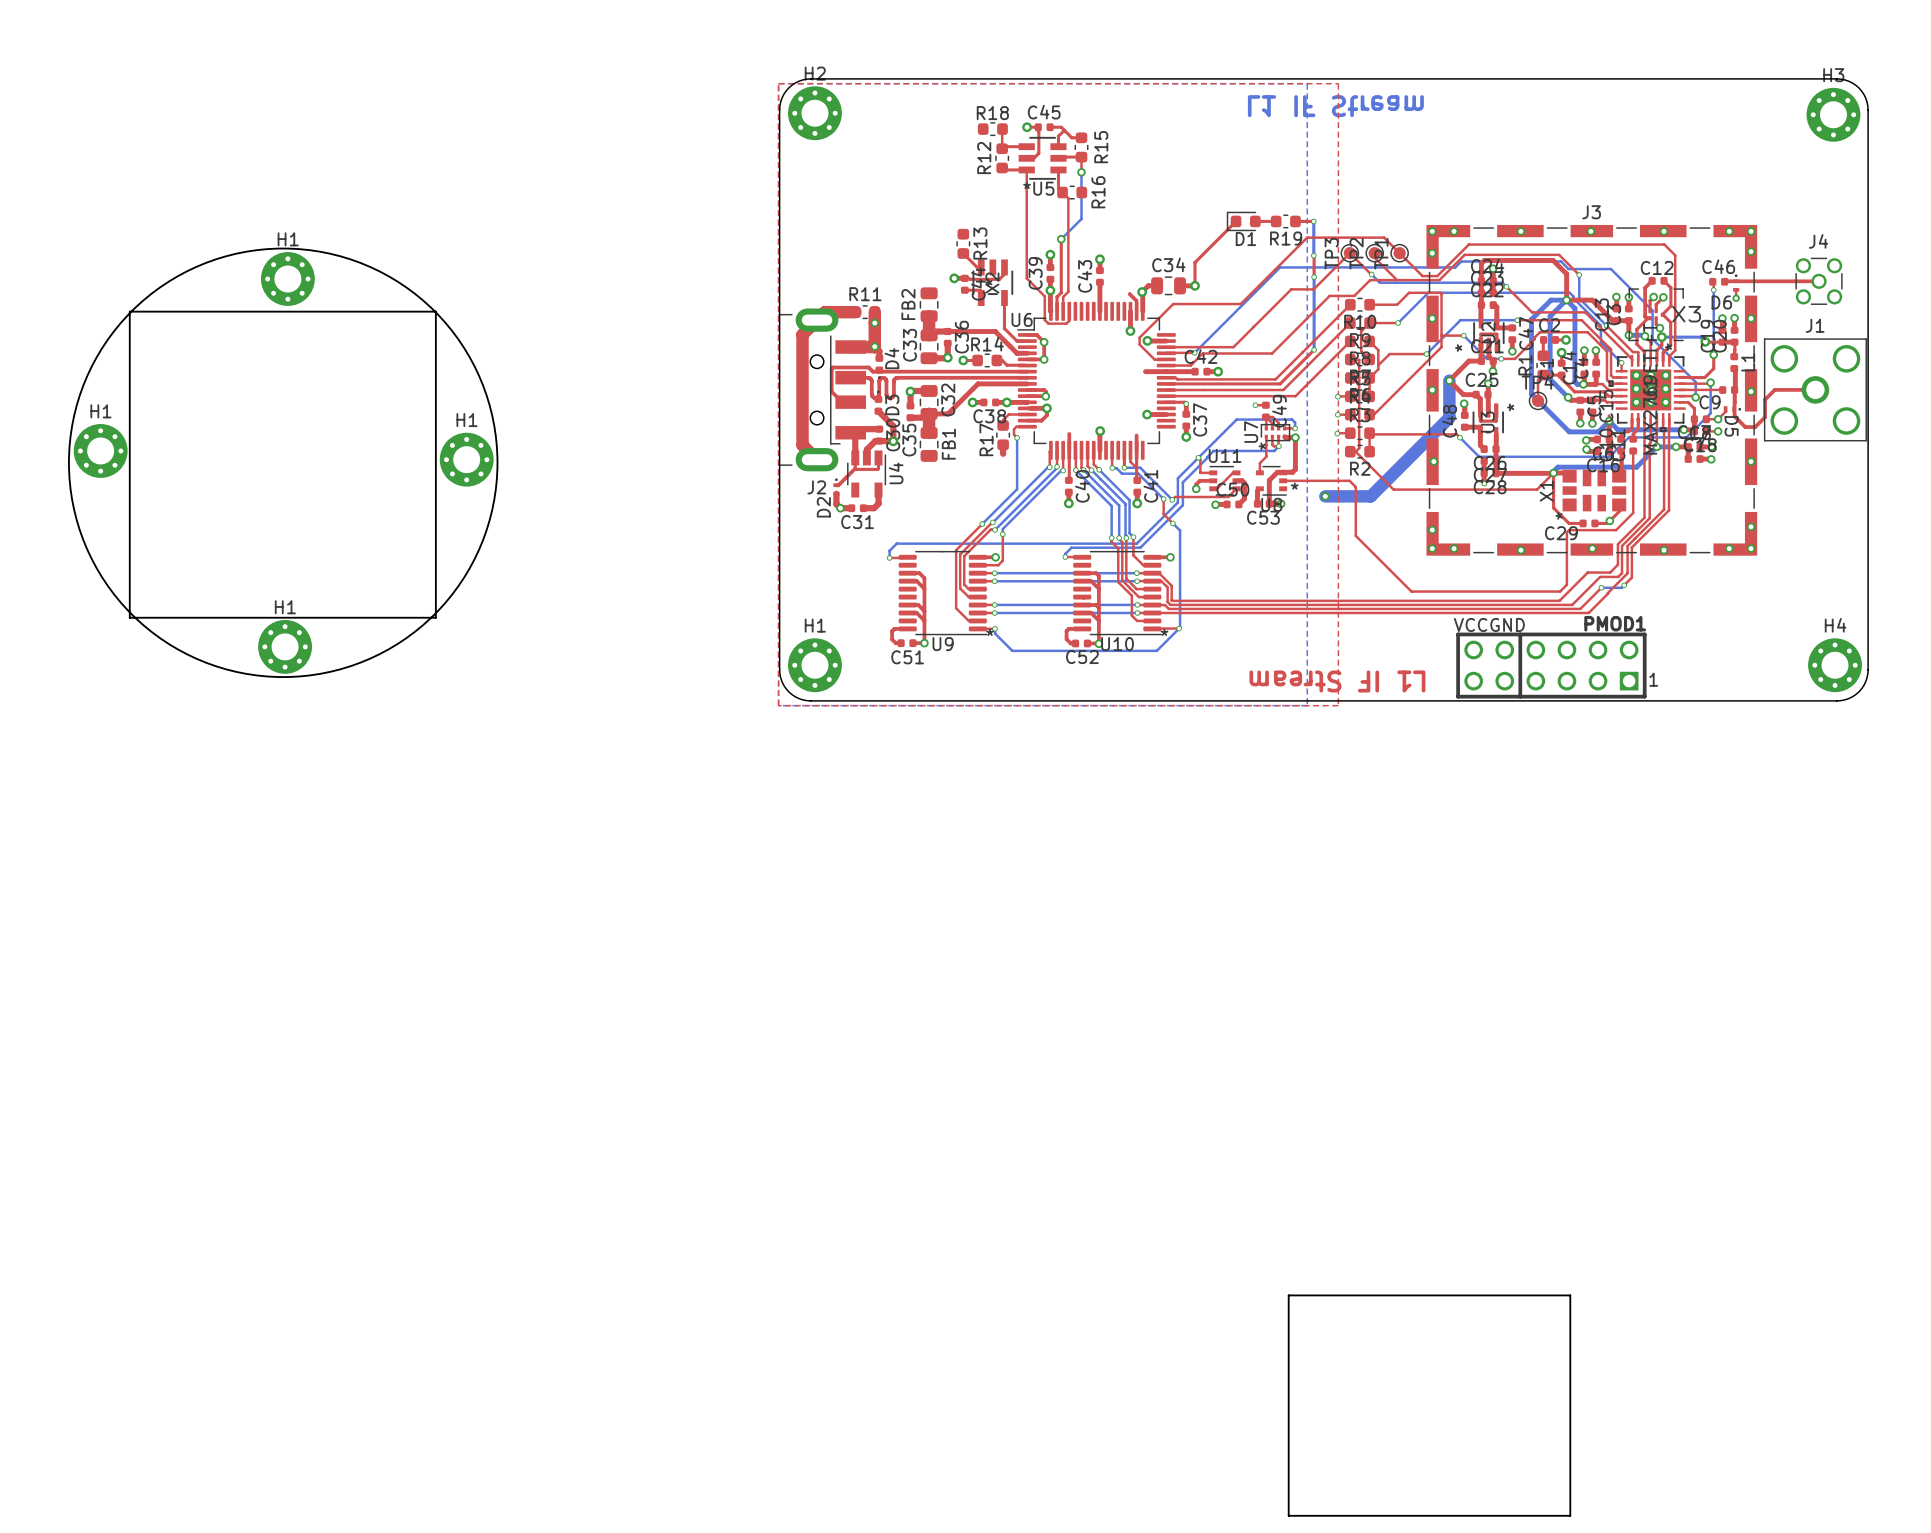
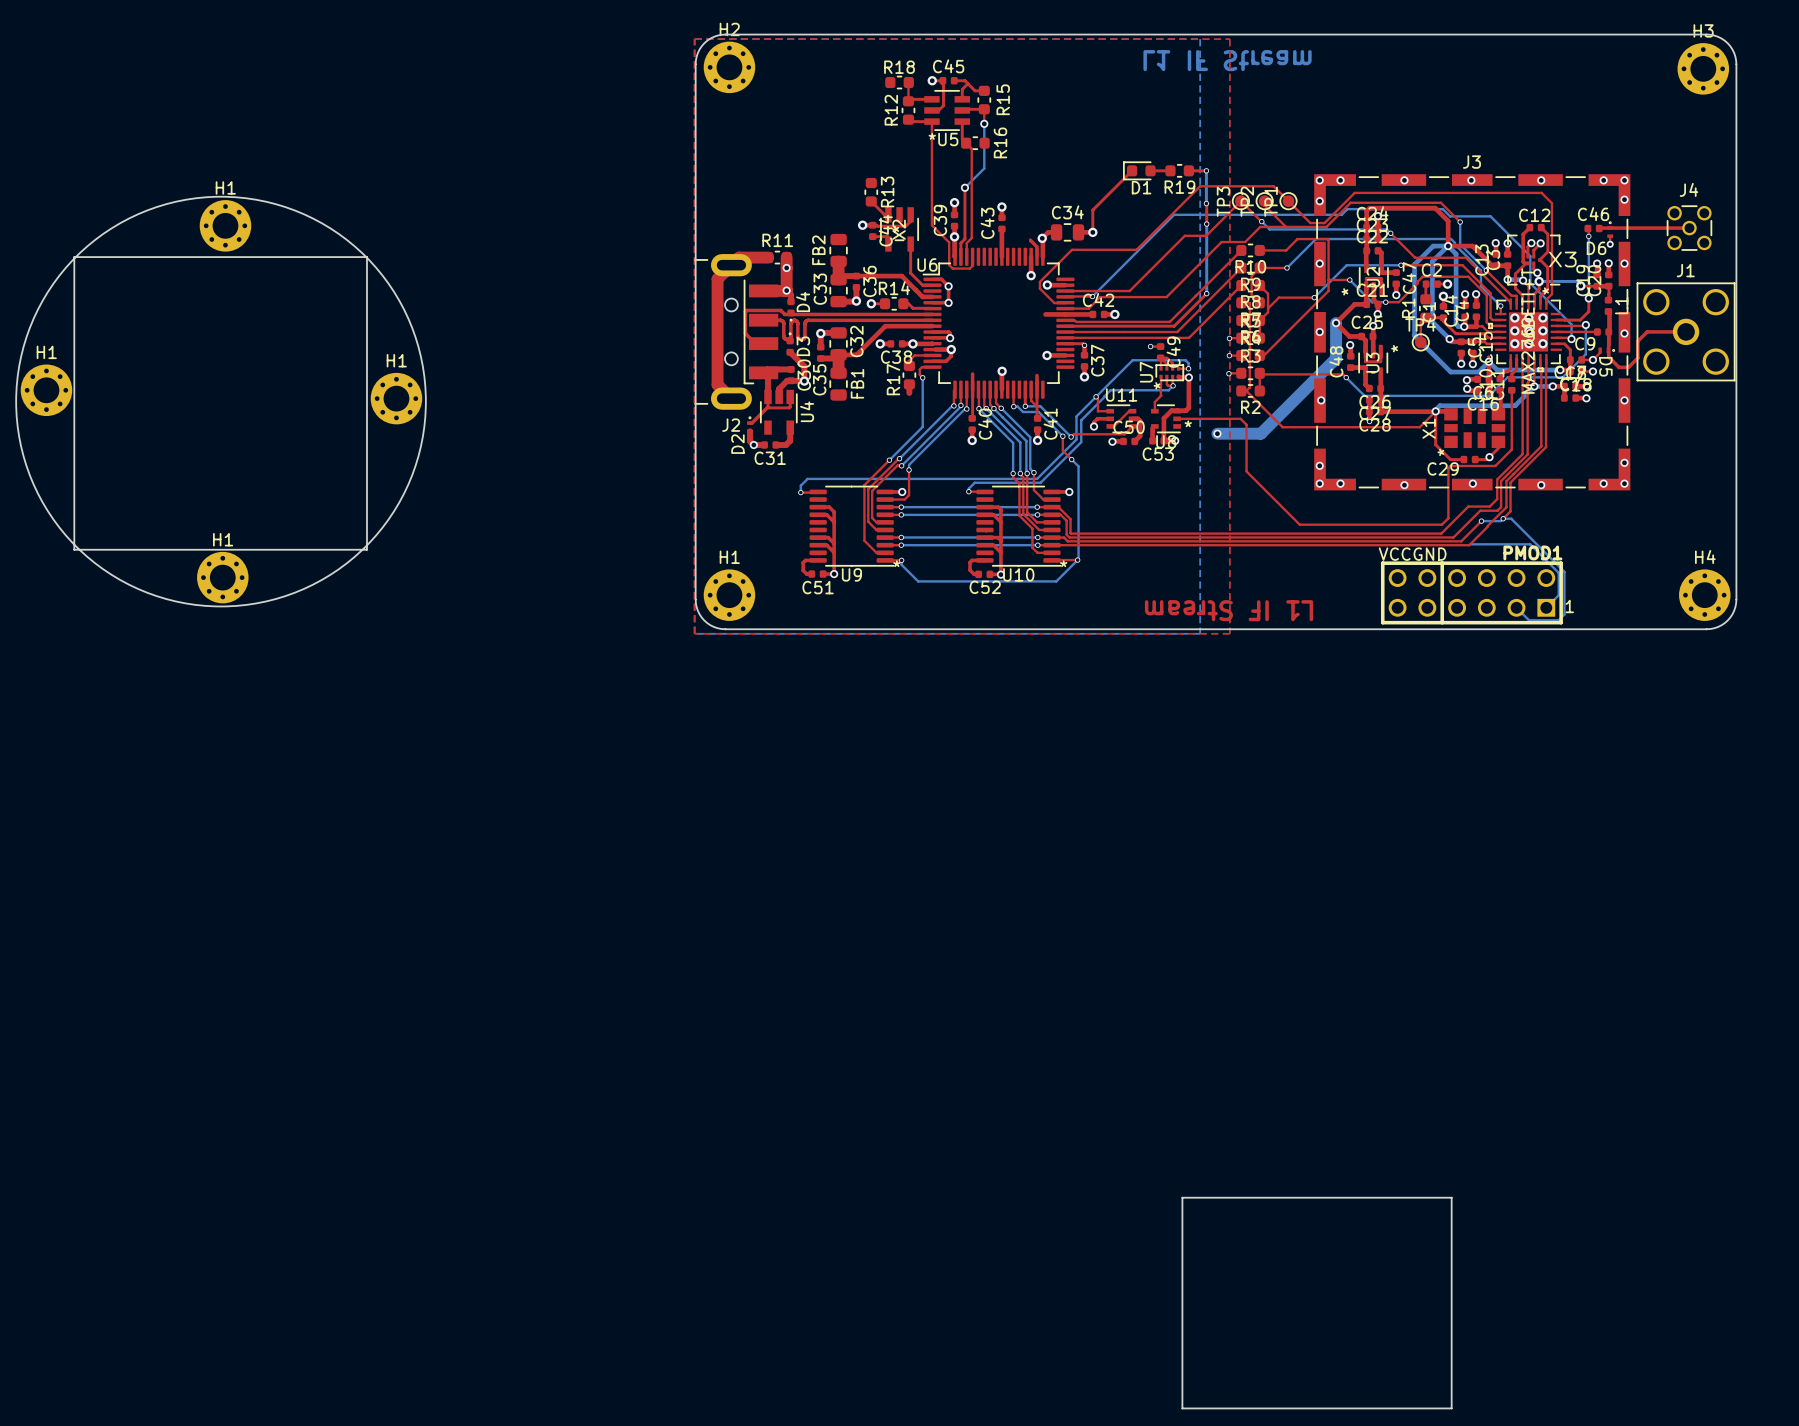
bottom track: none -> (1503, 518) (1511, 518) (1564, 571) (1564, 614) (1558, 620) (1529, 620) (1516, 607)
bottom track: none -> (1470, 544) (1530, 544) (1558, 572) (1558, 595) (1546, 607)
PMOD1 position: (1551, 665) -> (1471, 592)

